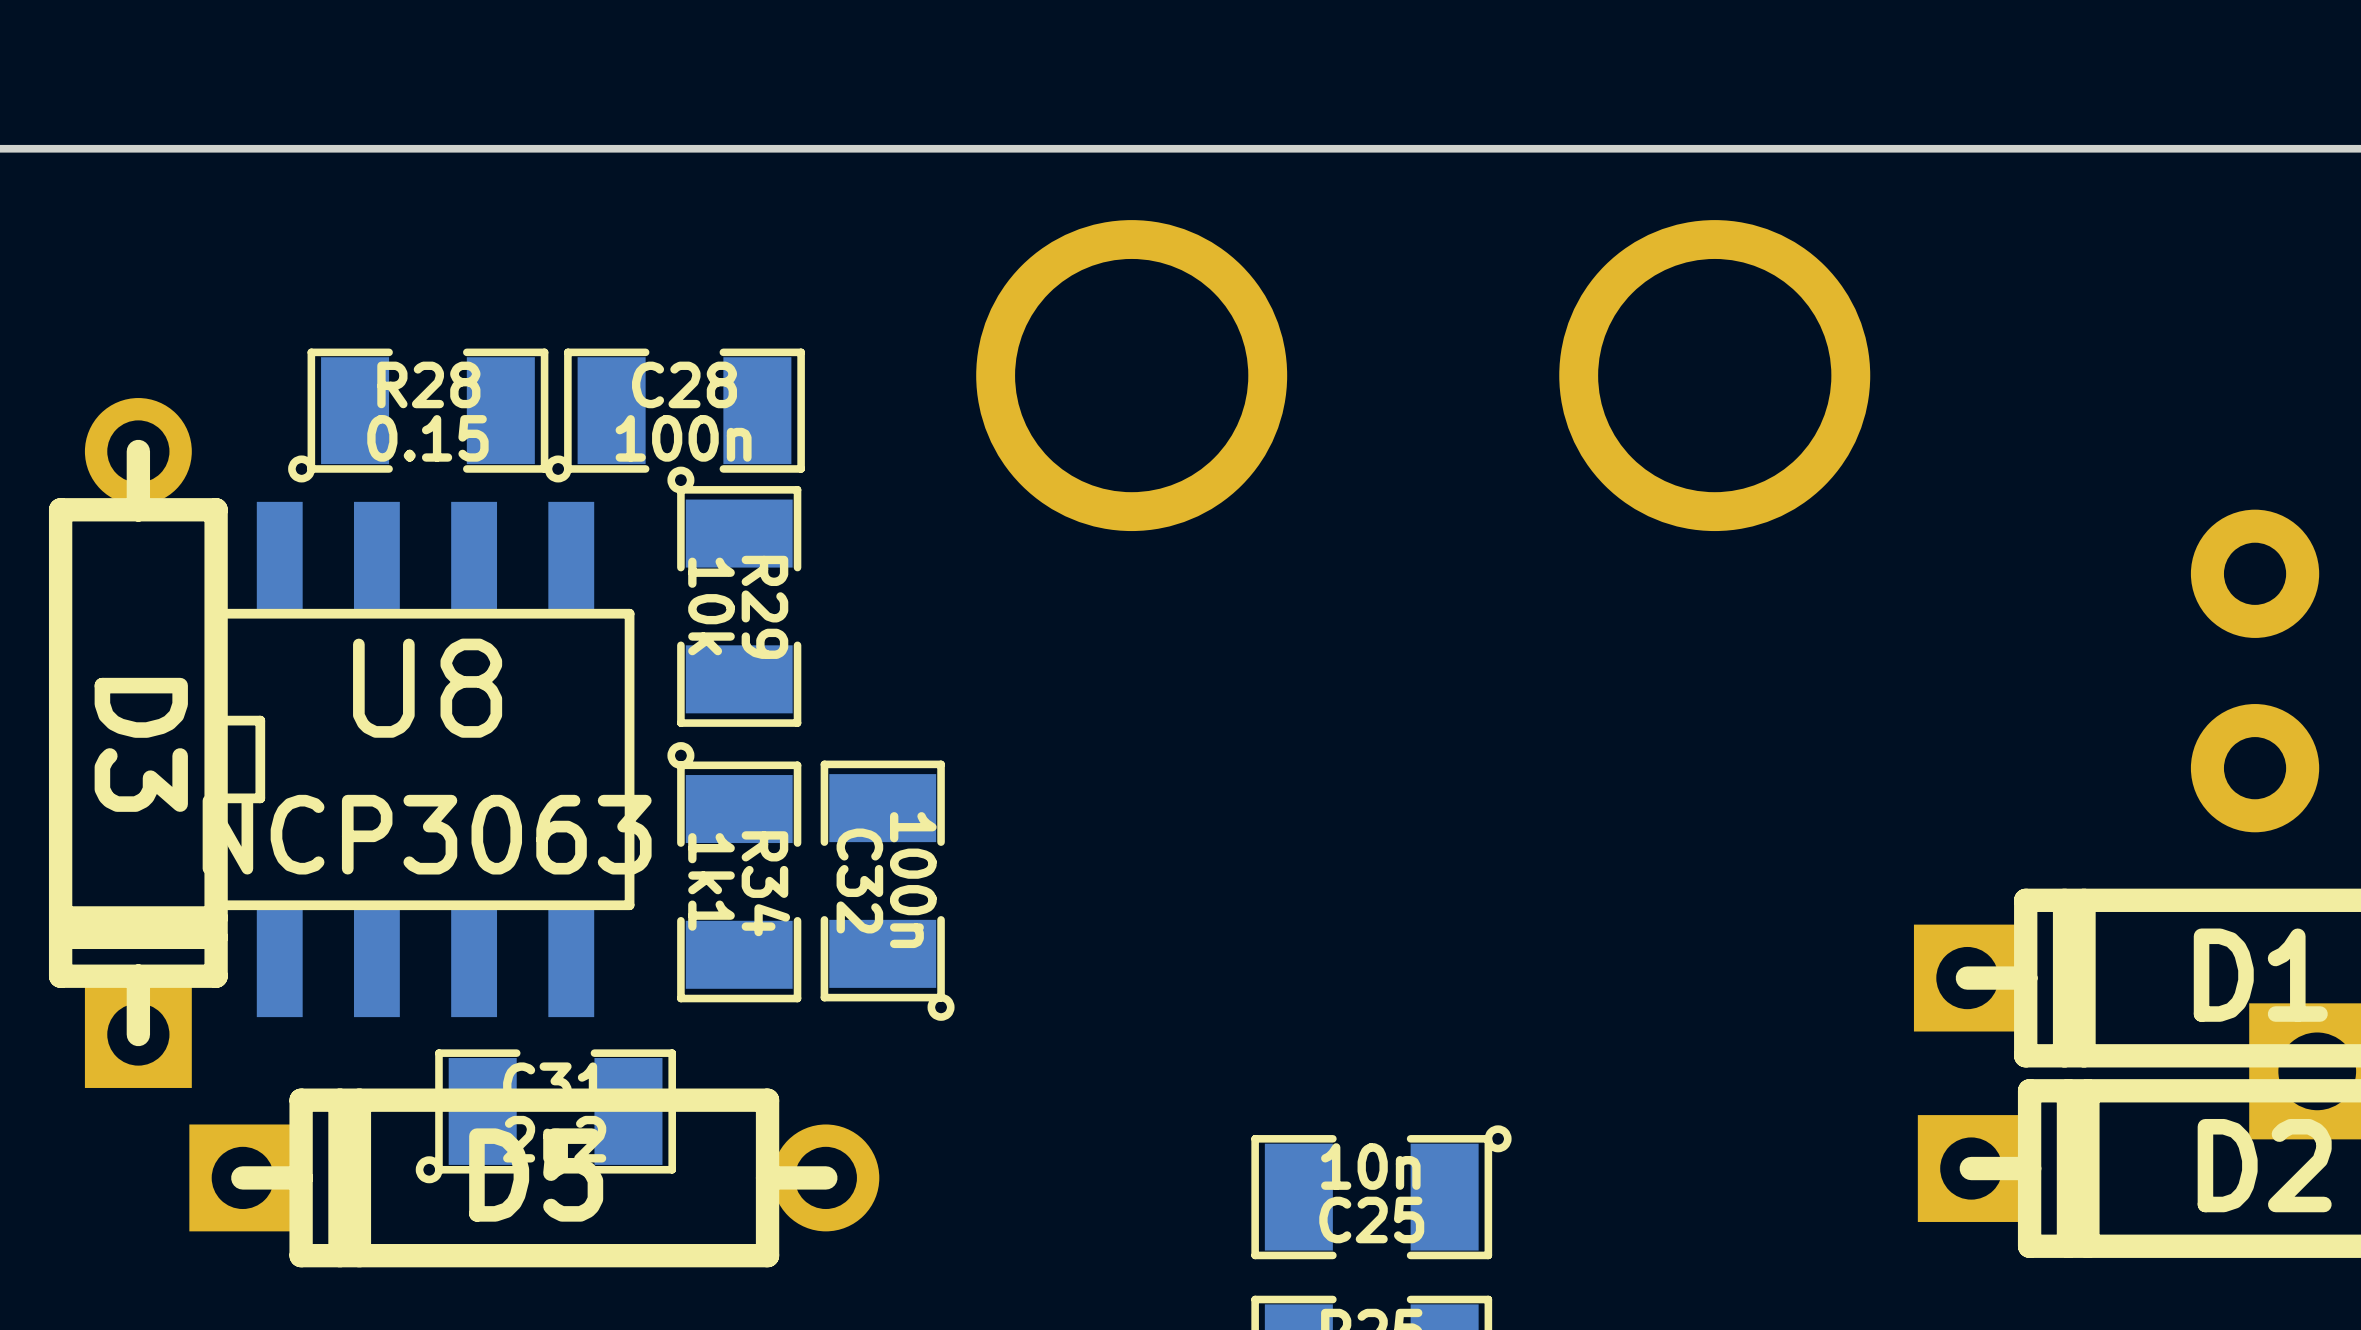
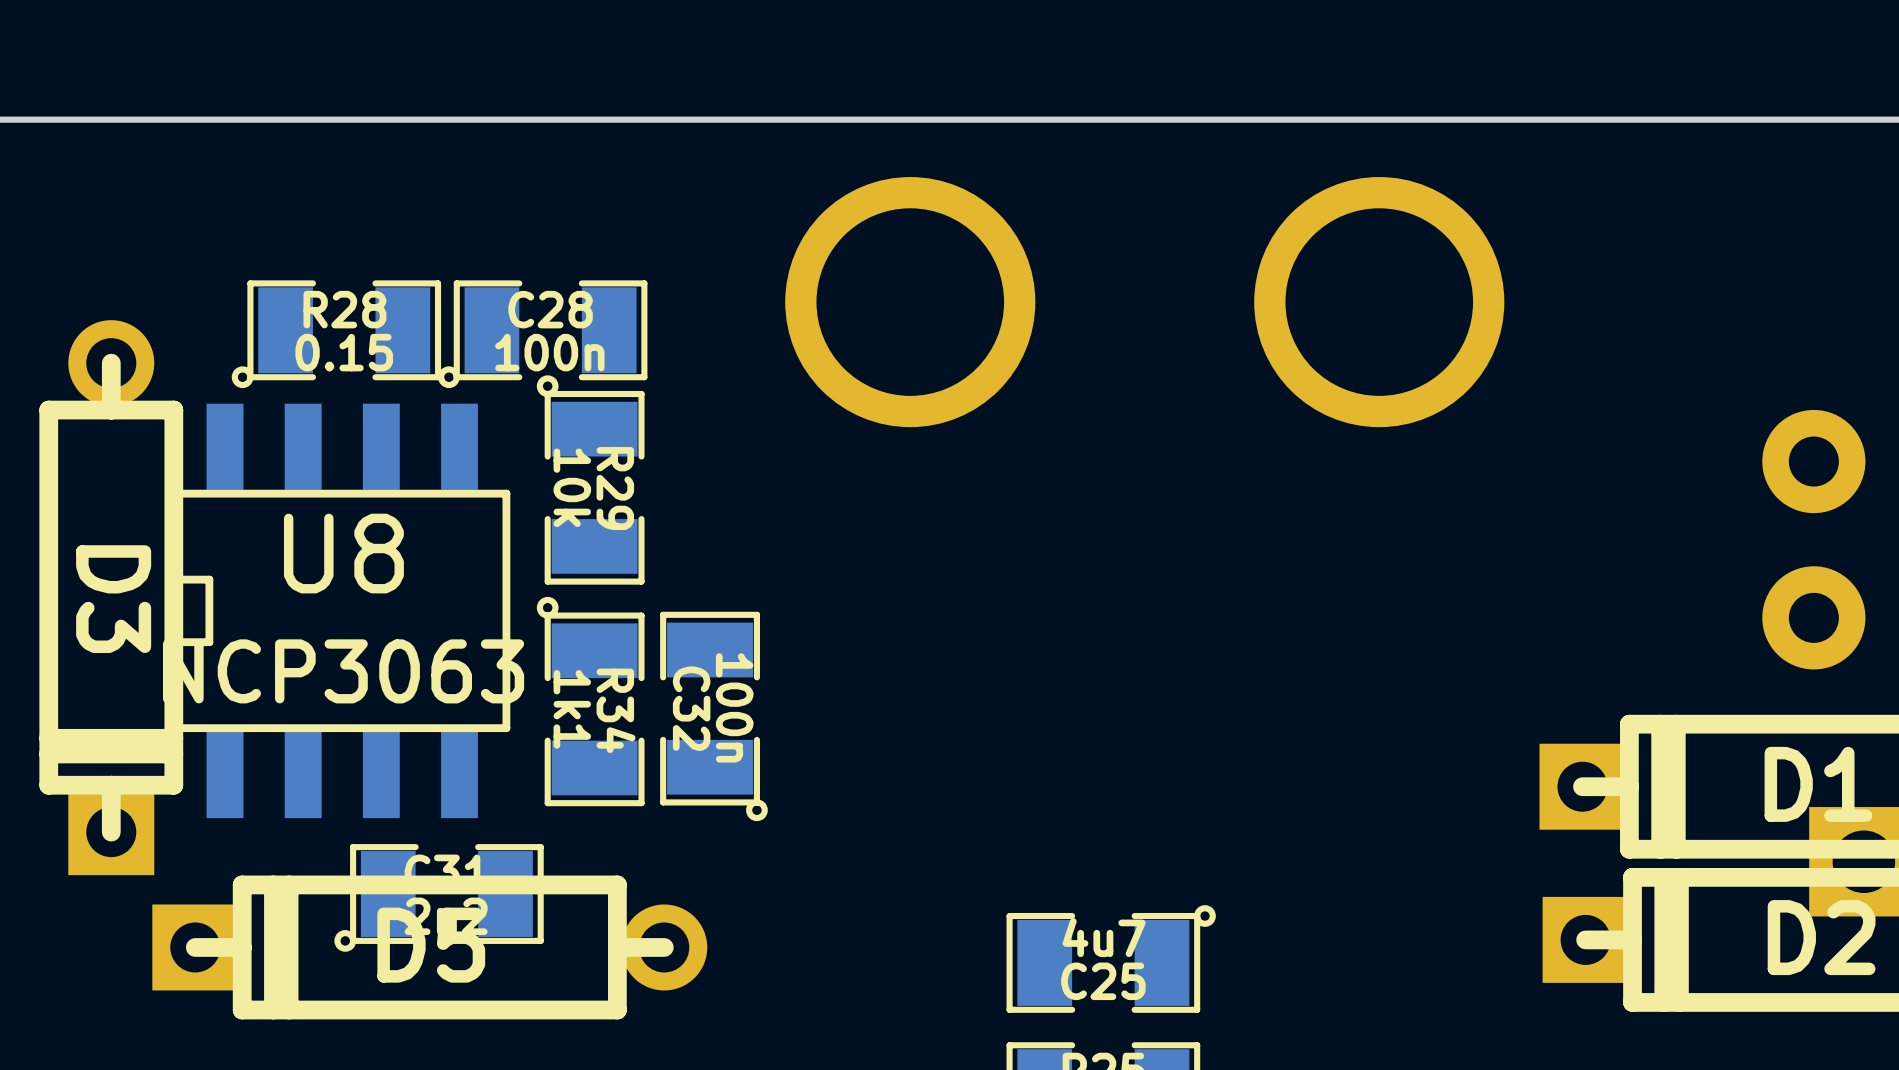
C25 value: 10n (1370, 1166) -> 4u7 (1104, 937)

